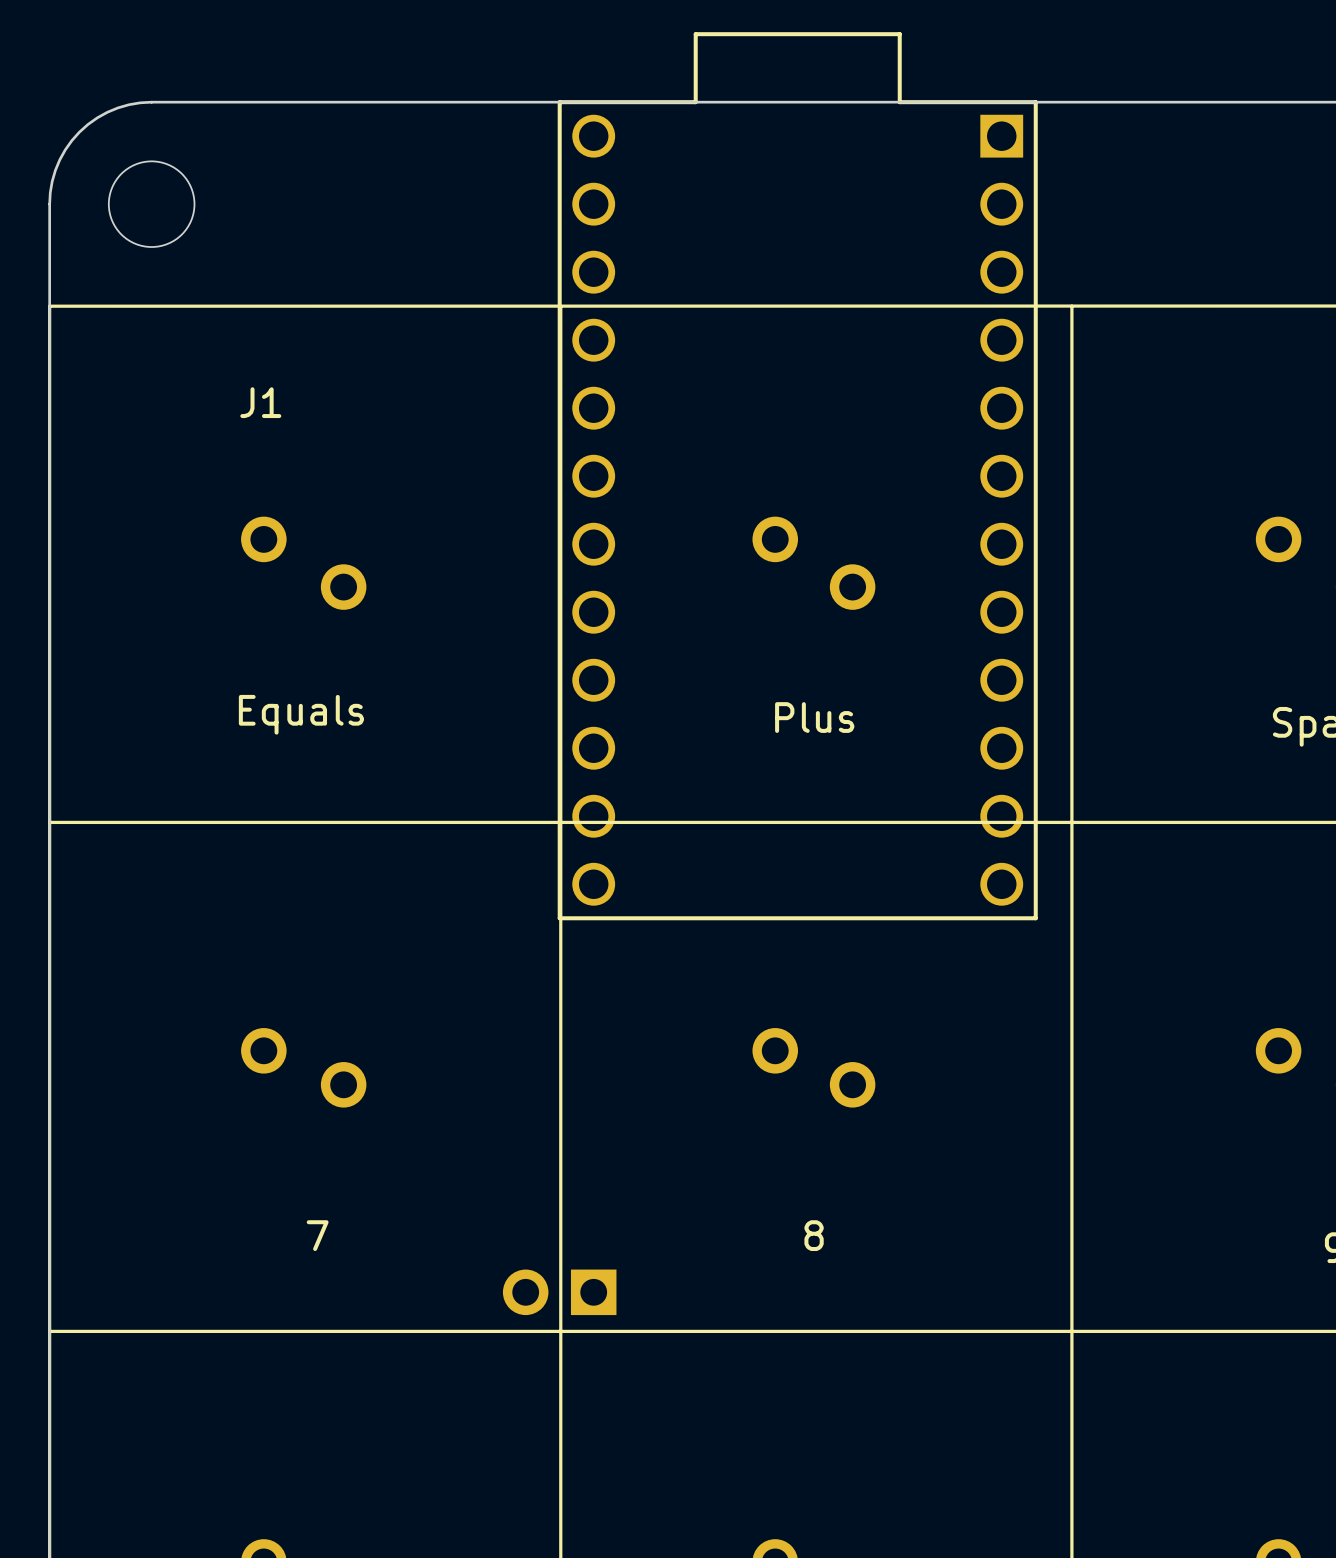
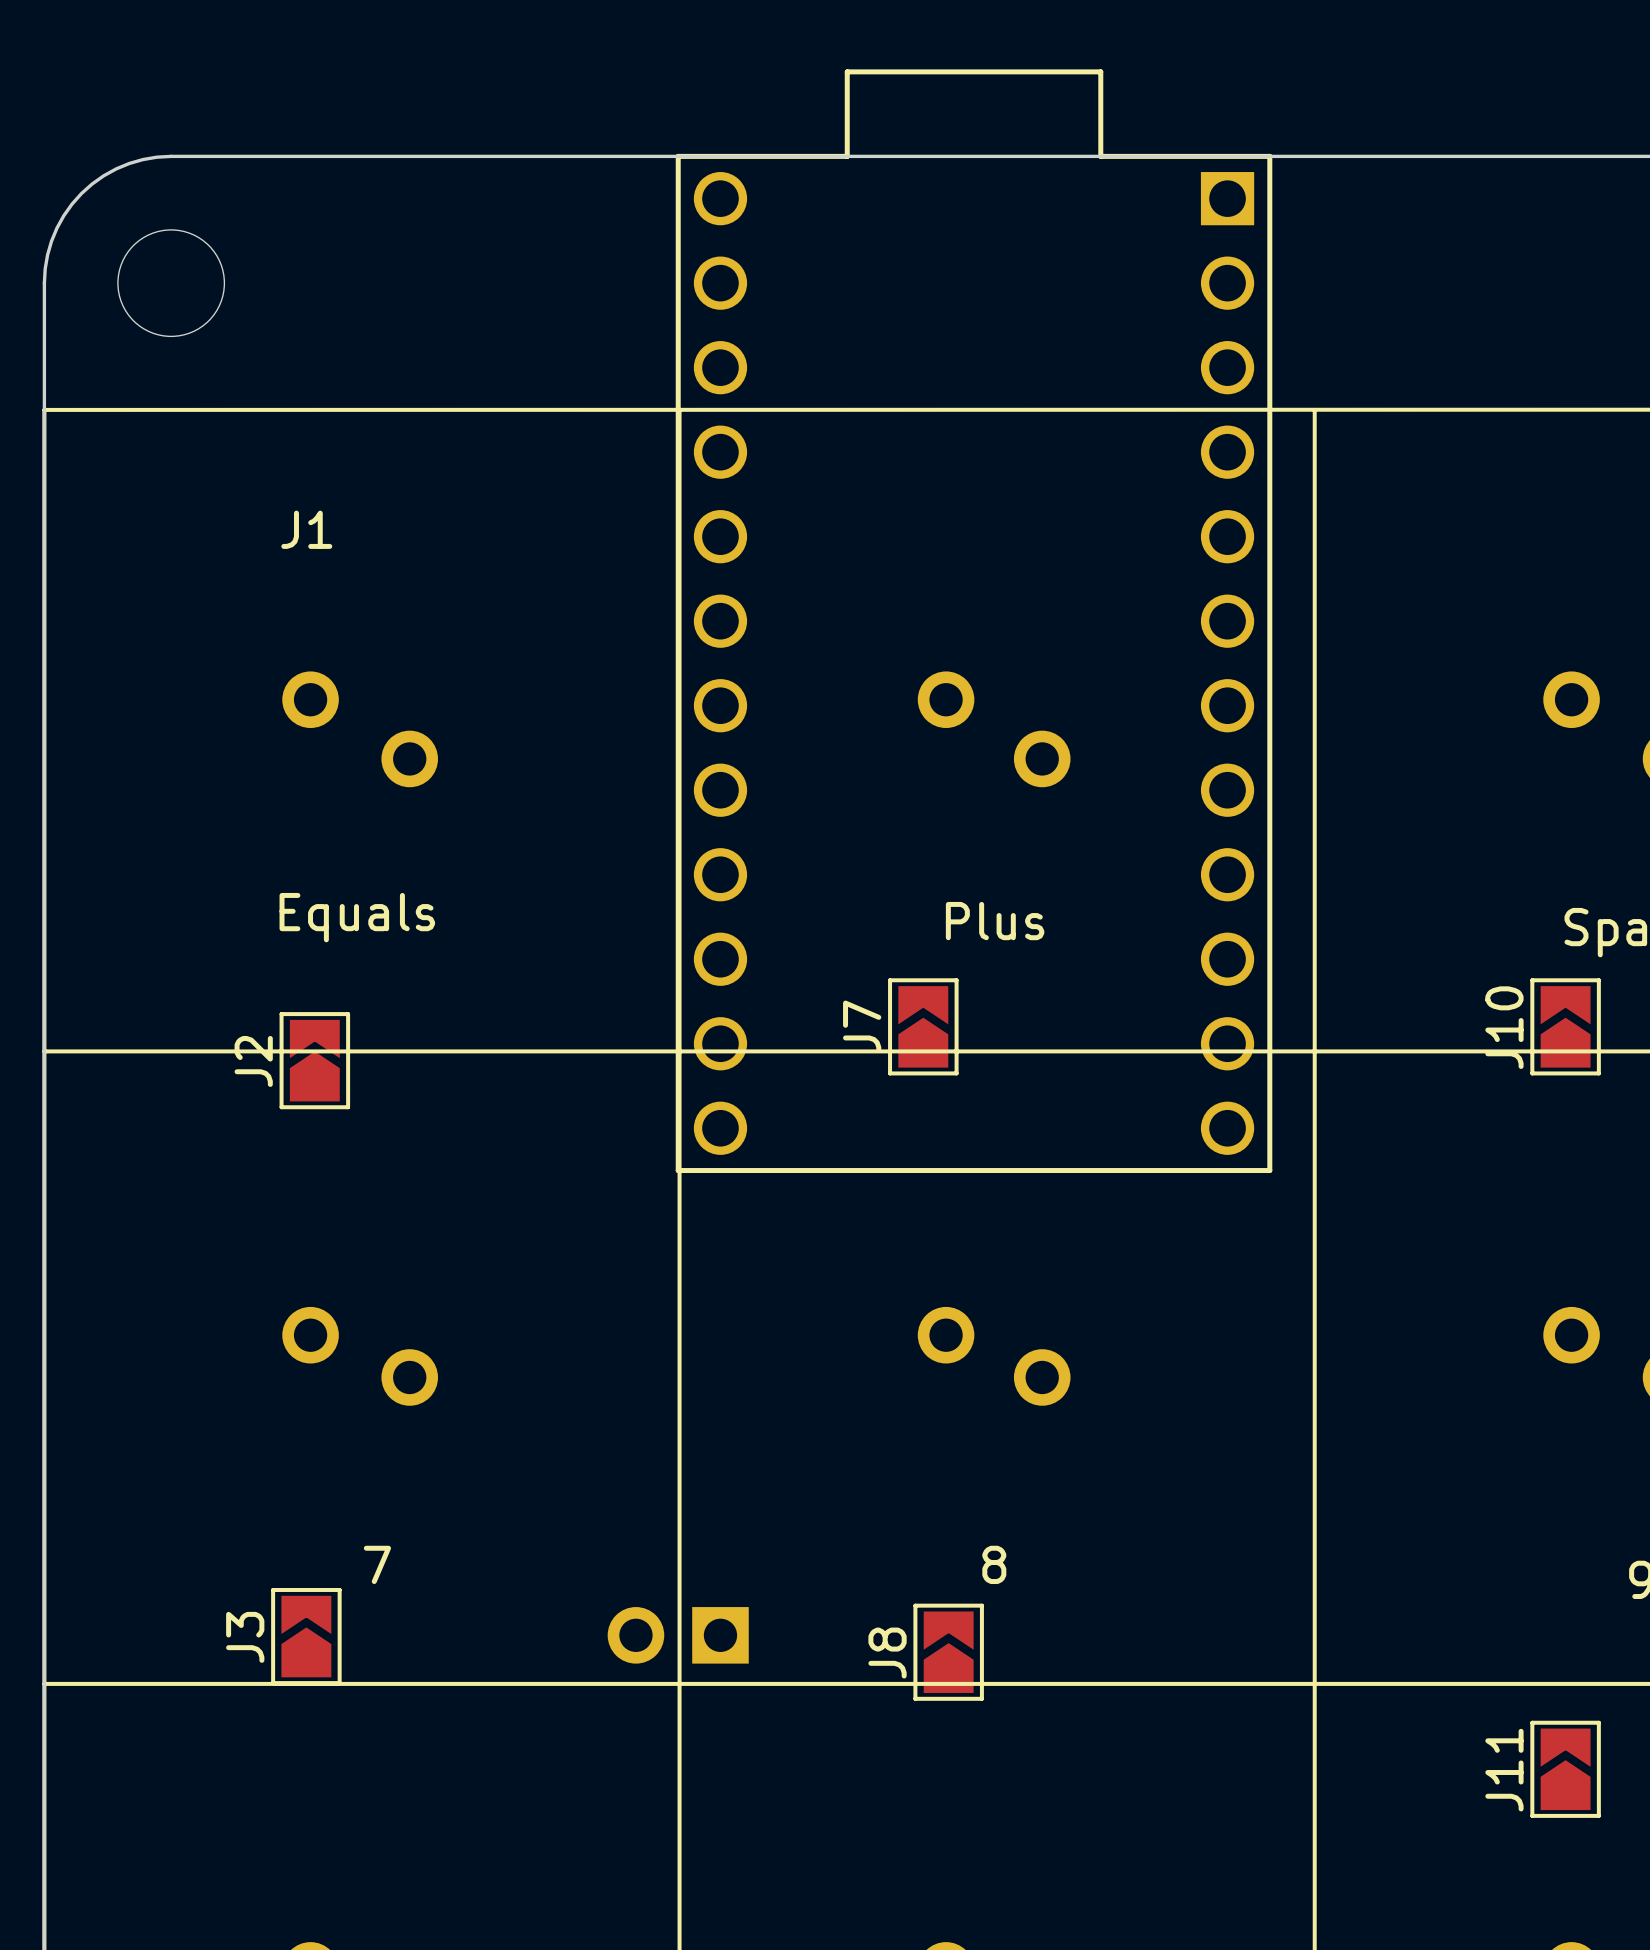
J7: none -> (923, 1026)
J10: none -> (1565, 1026)
J2: none -> (314, 1060)
J3: none -> (306, 1636)
J8: none -> (948, 1652)
J11: none -> (1565, 1769)

